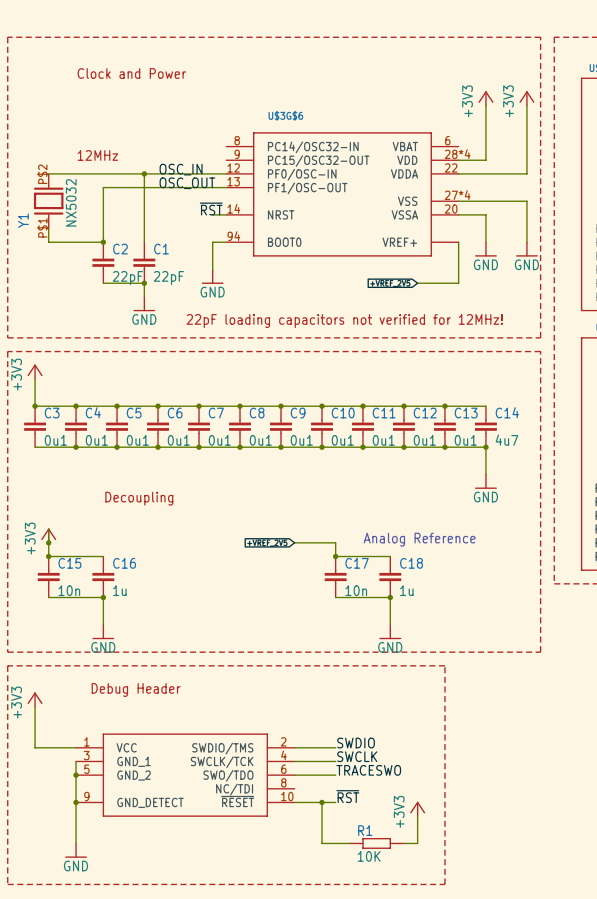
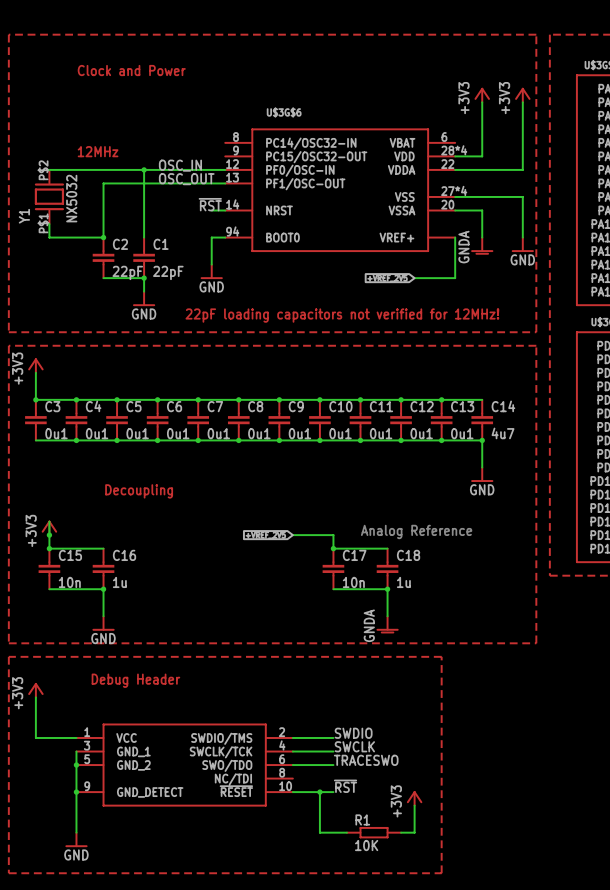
power symbol: GND (485, 249) -> GNDA (482, 246)
power symbol: GND (390, 632) -> GNDA (387, 624)

